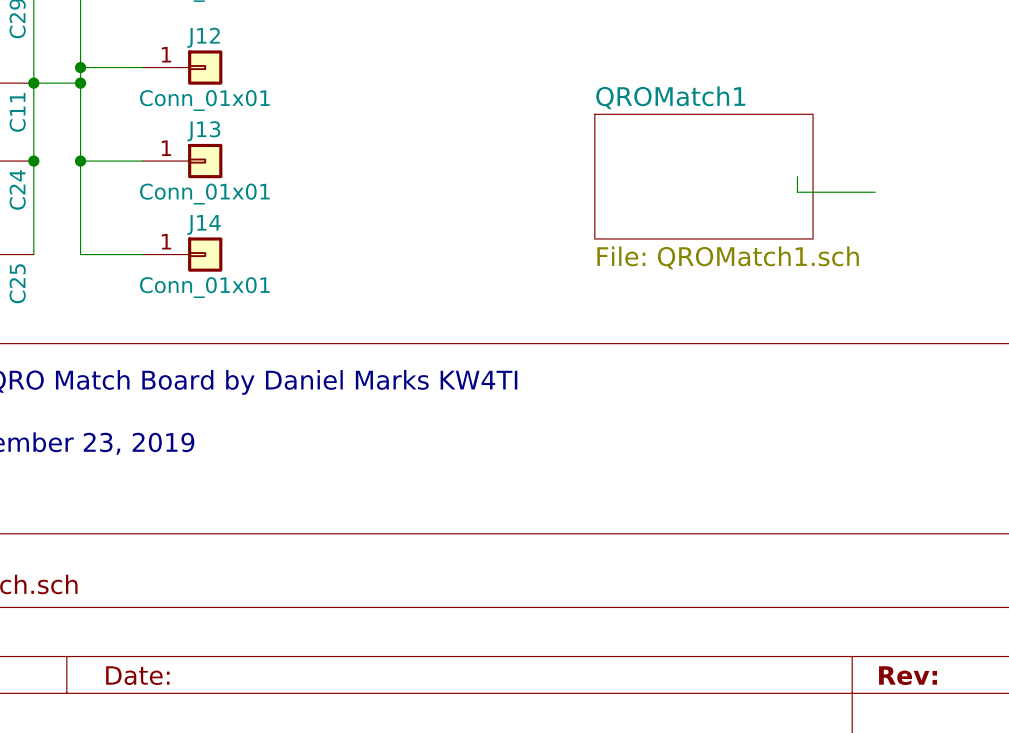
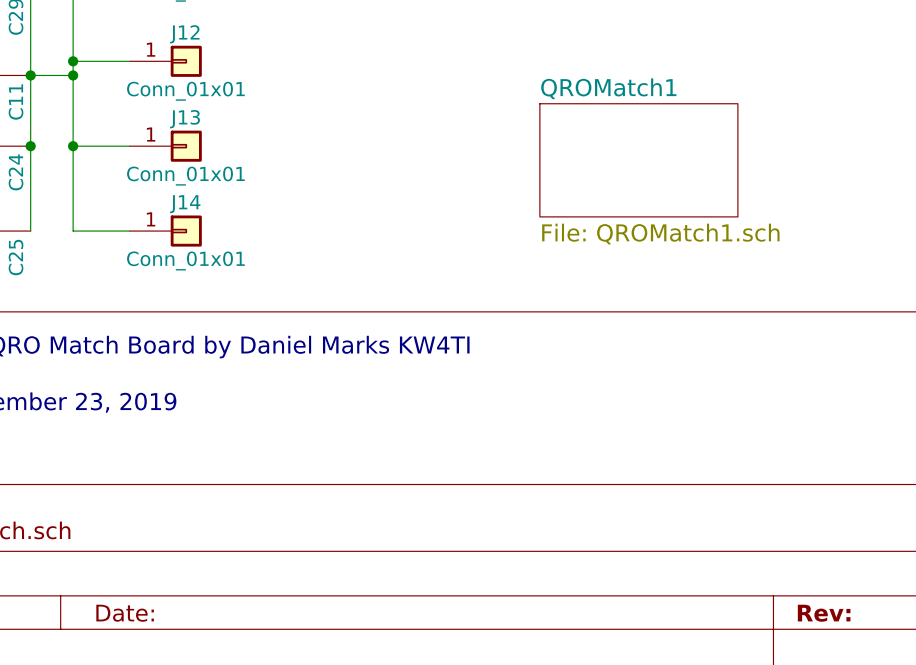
wire: (797, 176) (797, 192) (875, 192) -> none

